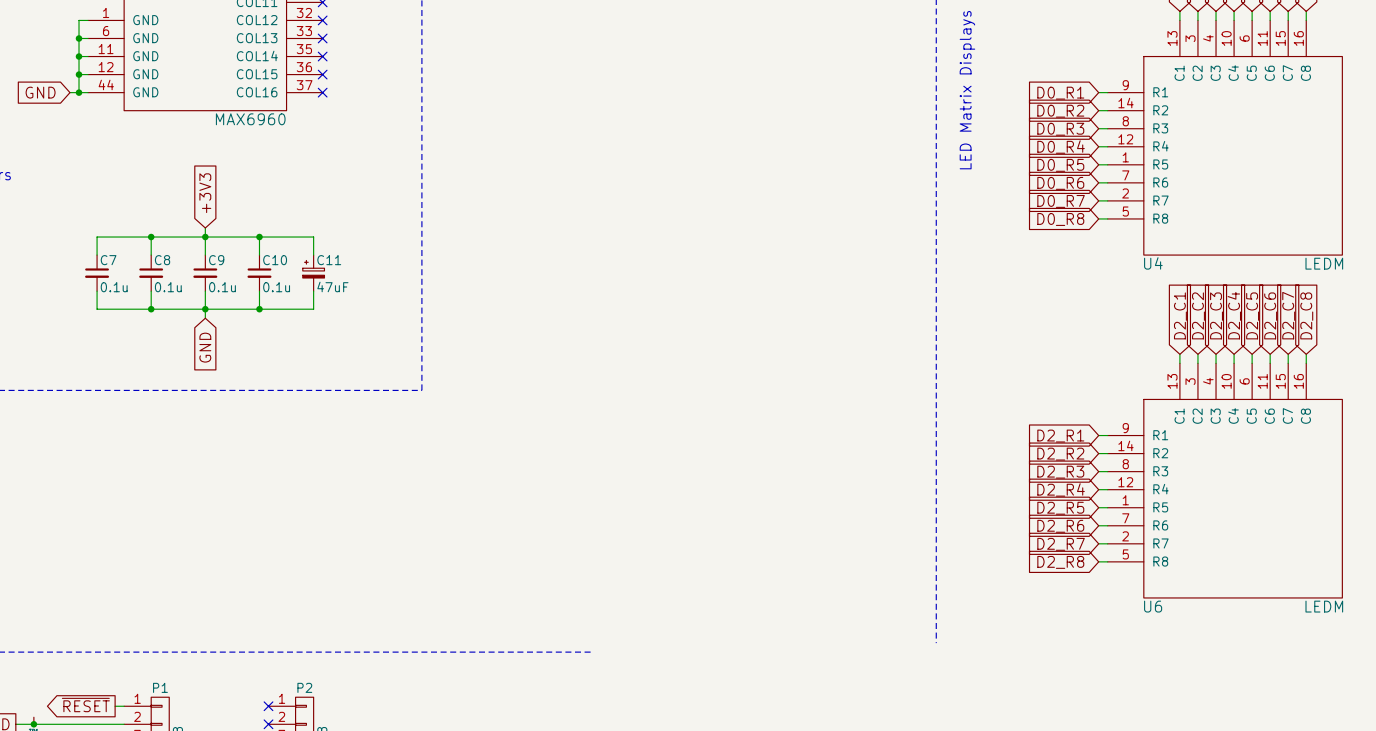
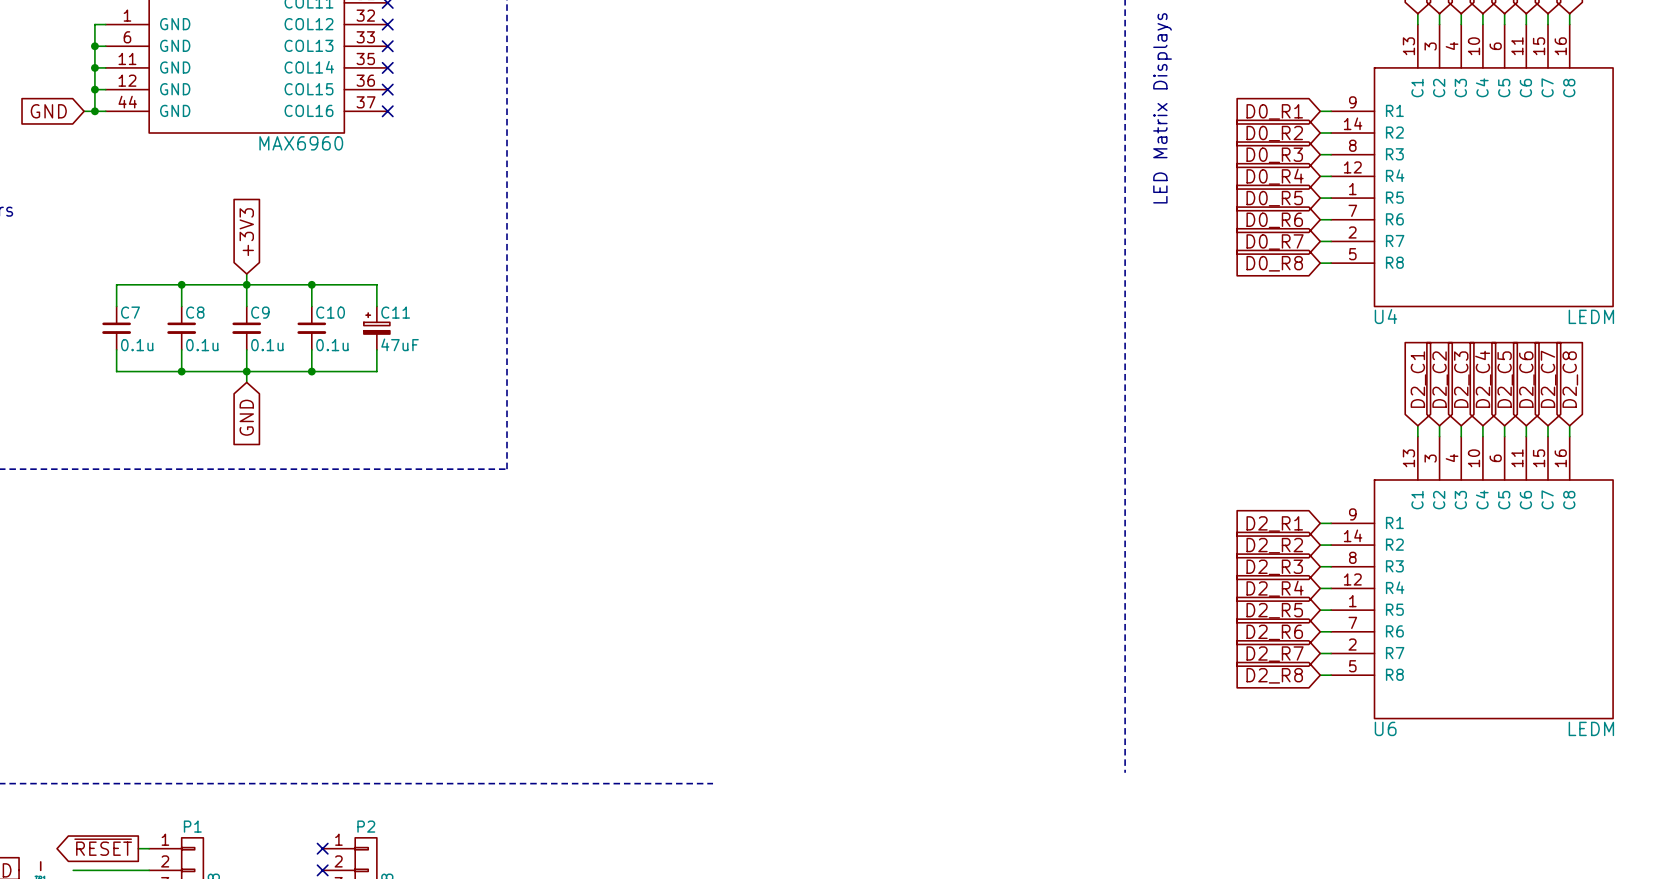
wire: (15, 724) (60, 724) -> none
junction: (33, 724) -> none

